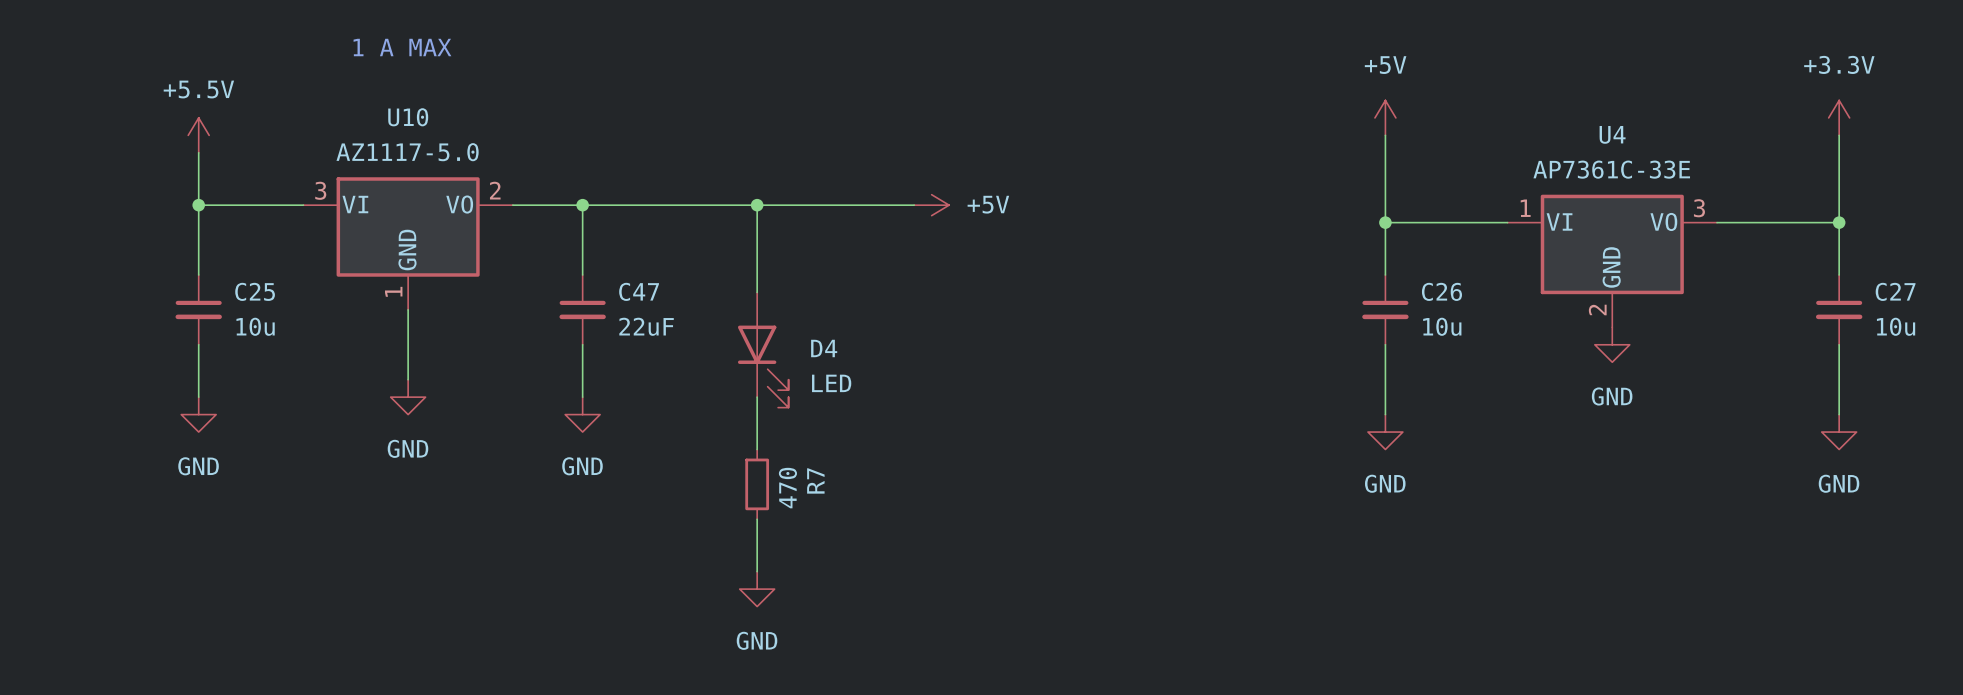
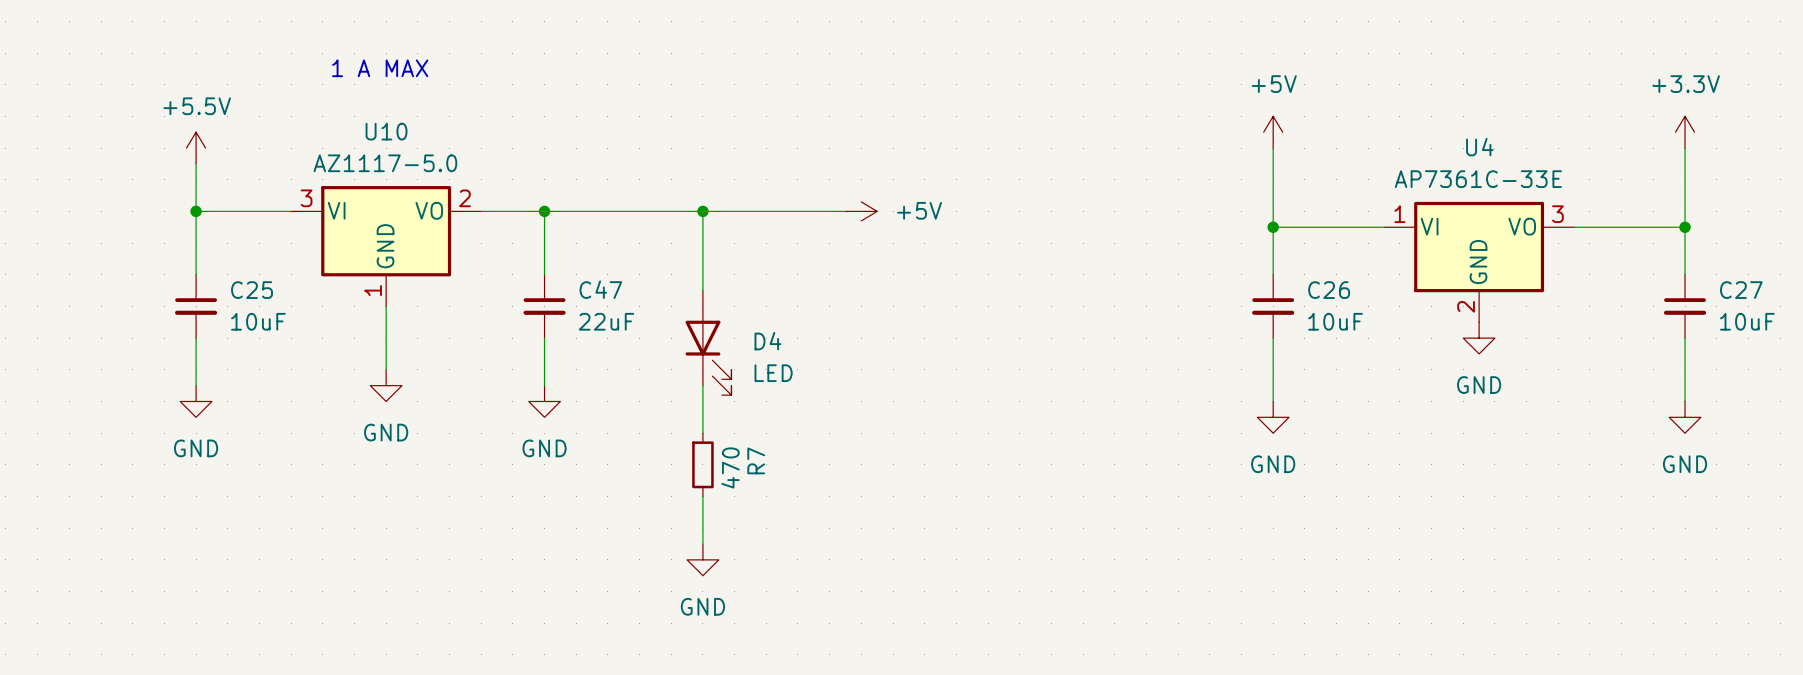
C25 value: 10u (255, 326) -> 10uF (258, 321)
C26 value: 10u (1442, 326) -> 10uF (1335, 321)
C27 value: 10u (1896, 326) -> 10uF (1747, 321)

